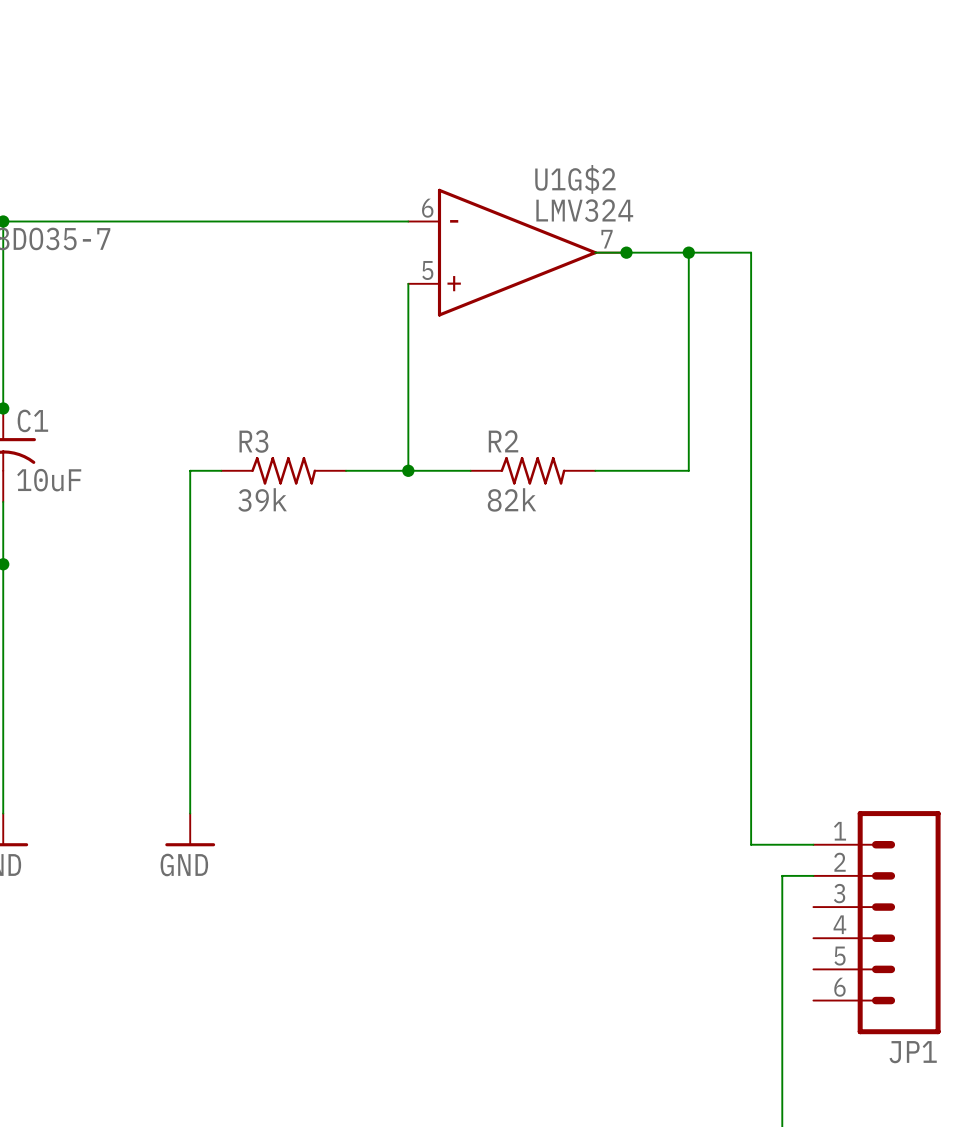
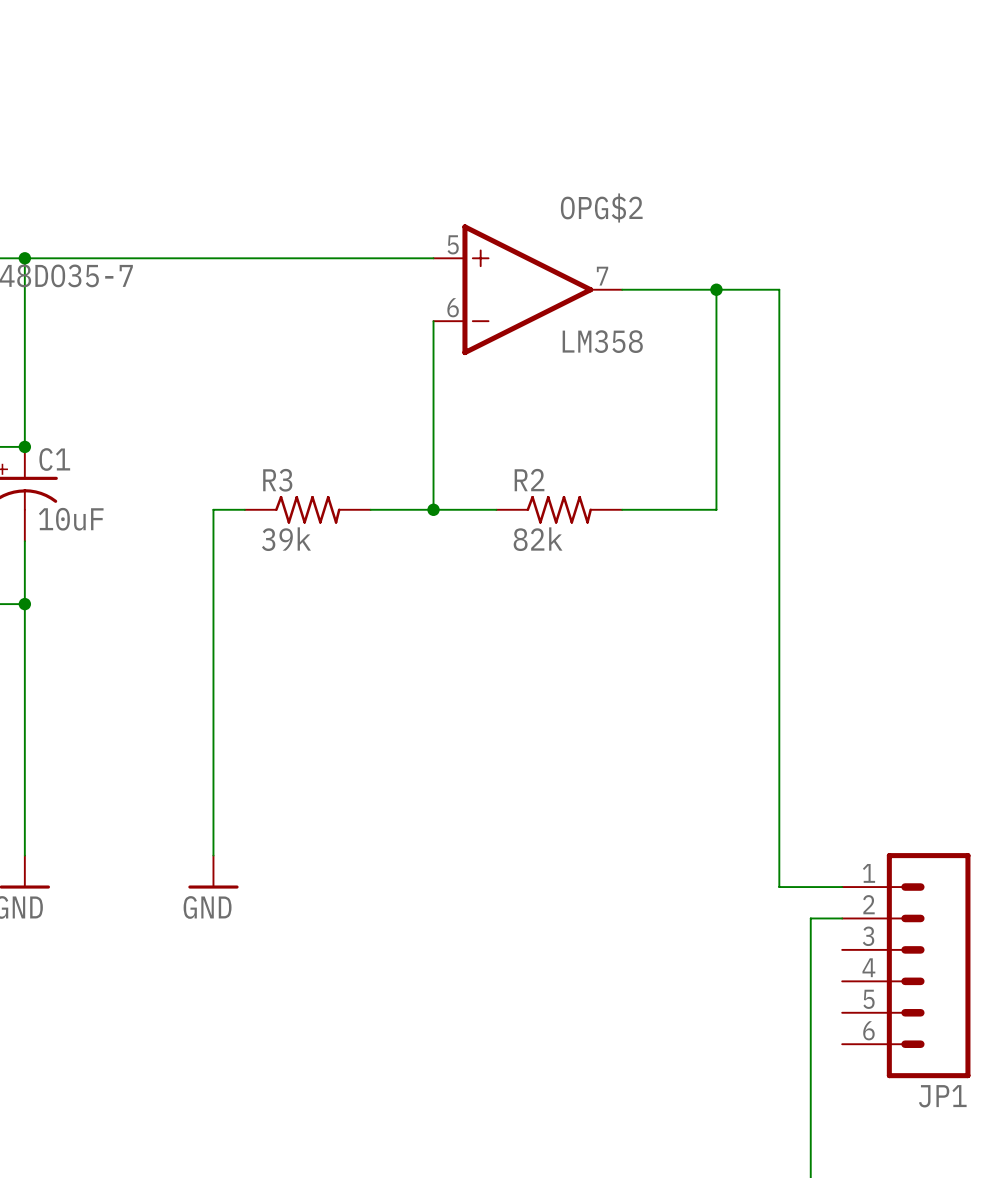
OPG$2: none -> LM358 (527, 289)
U1G$2: LMV324 (517, 252) -> none
junction: (626, 252) -> none

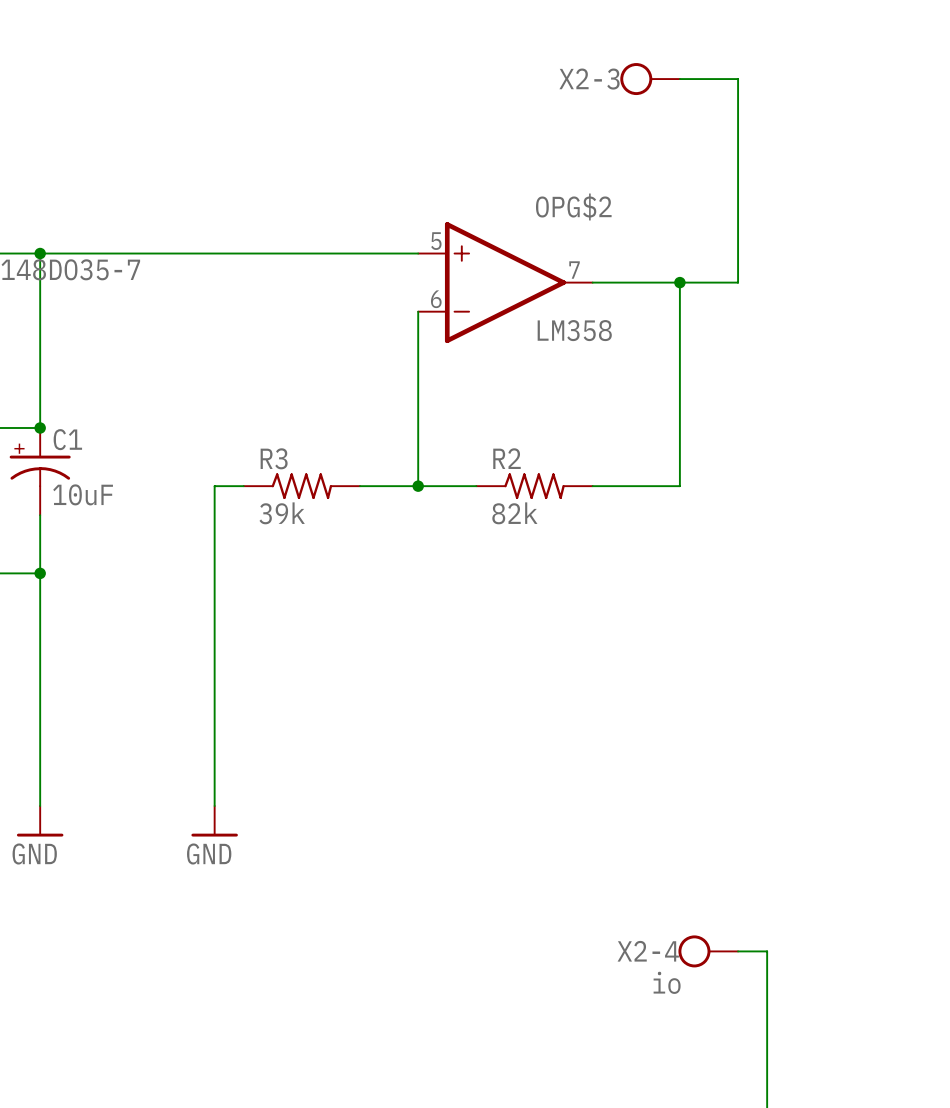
X2-3: none -> (650, 79)
wire: (779, 289) (779, 887) (842, 887) -> (738, 282) (738, 79) (679, 79)
wire: (842, 918) (810, 918) (810, 1012) -> (738, 951) (767, 951)
JP1: (906, 965) -> none
X2-4: none -> io (708, 951)

